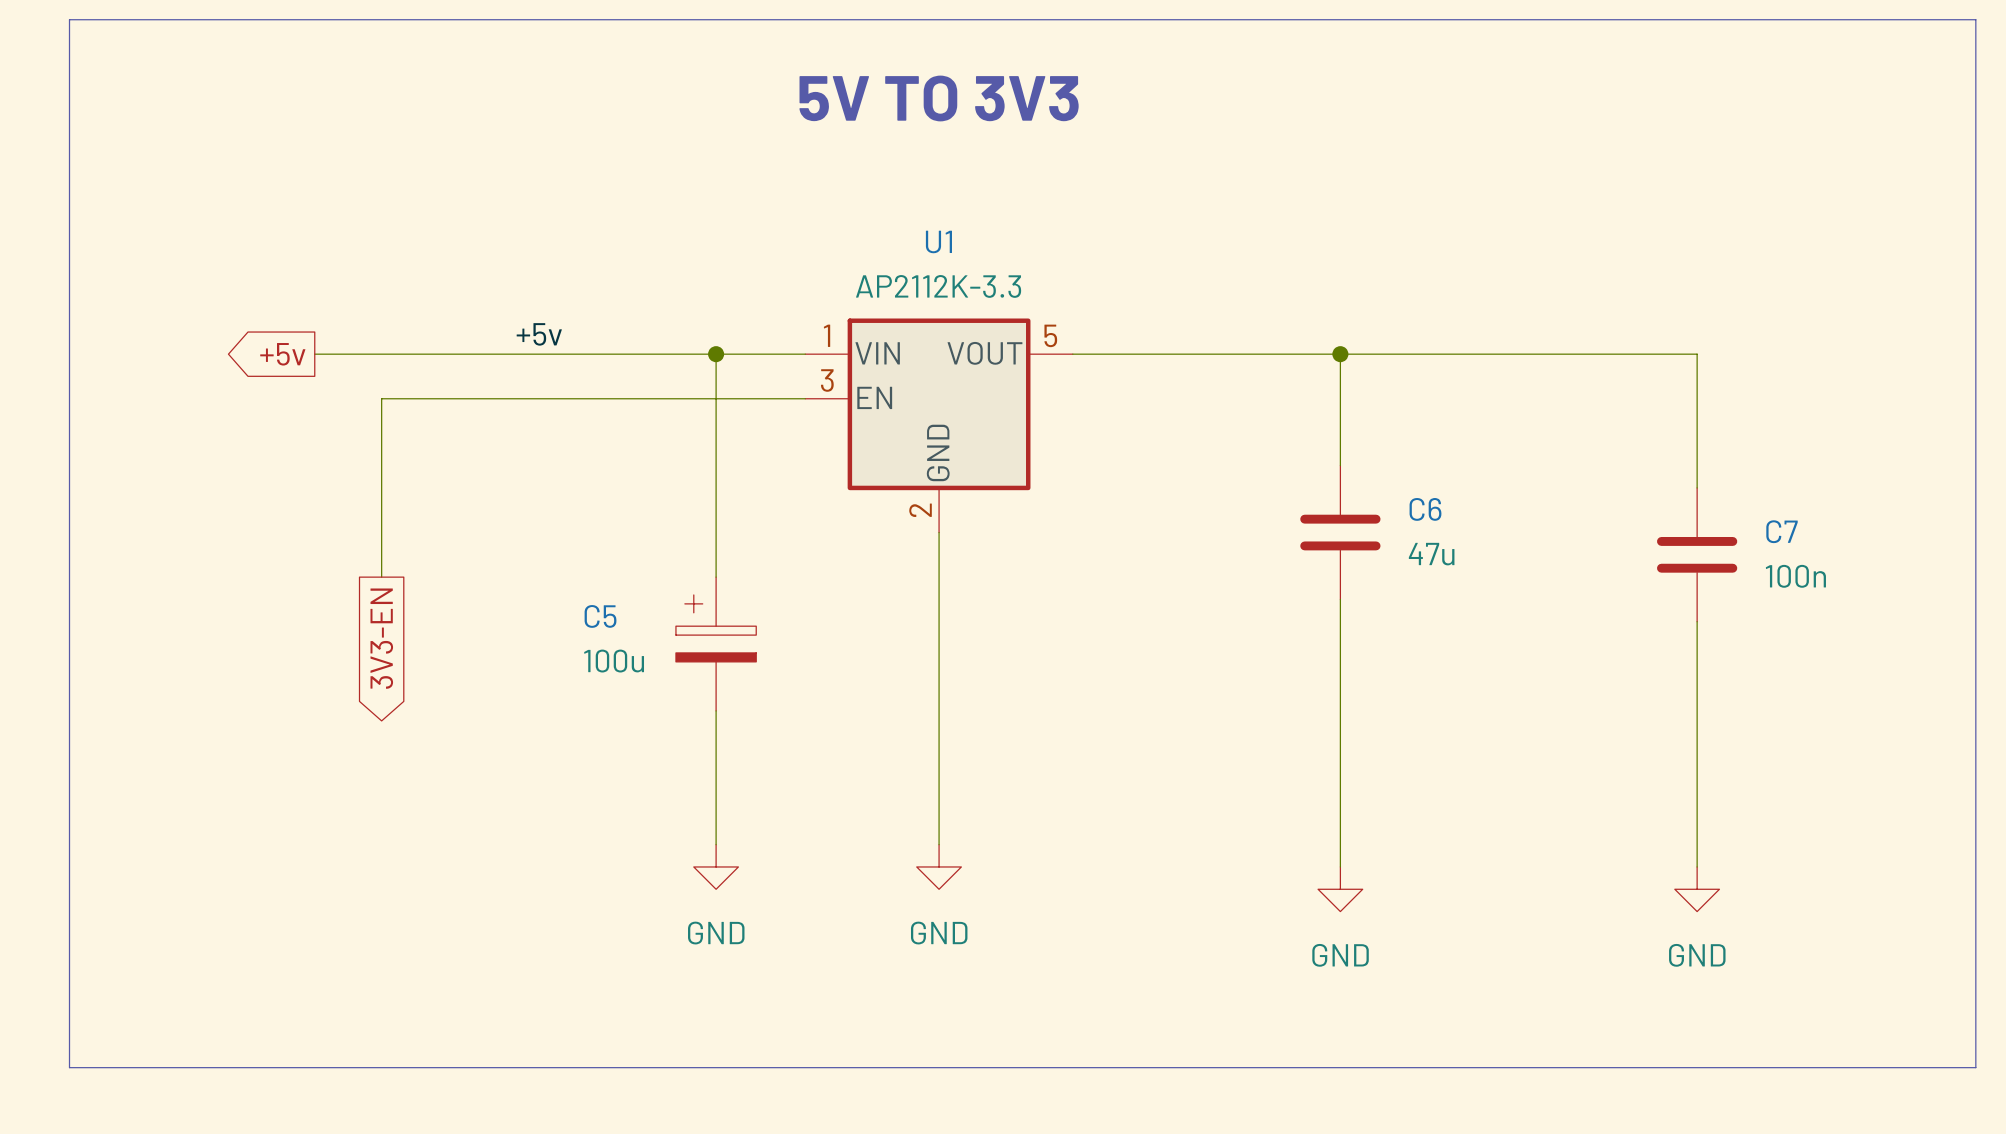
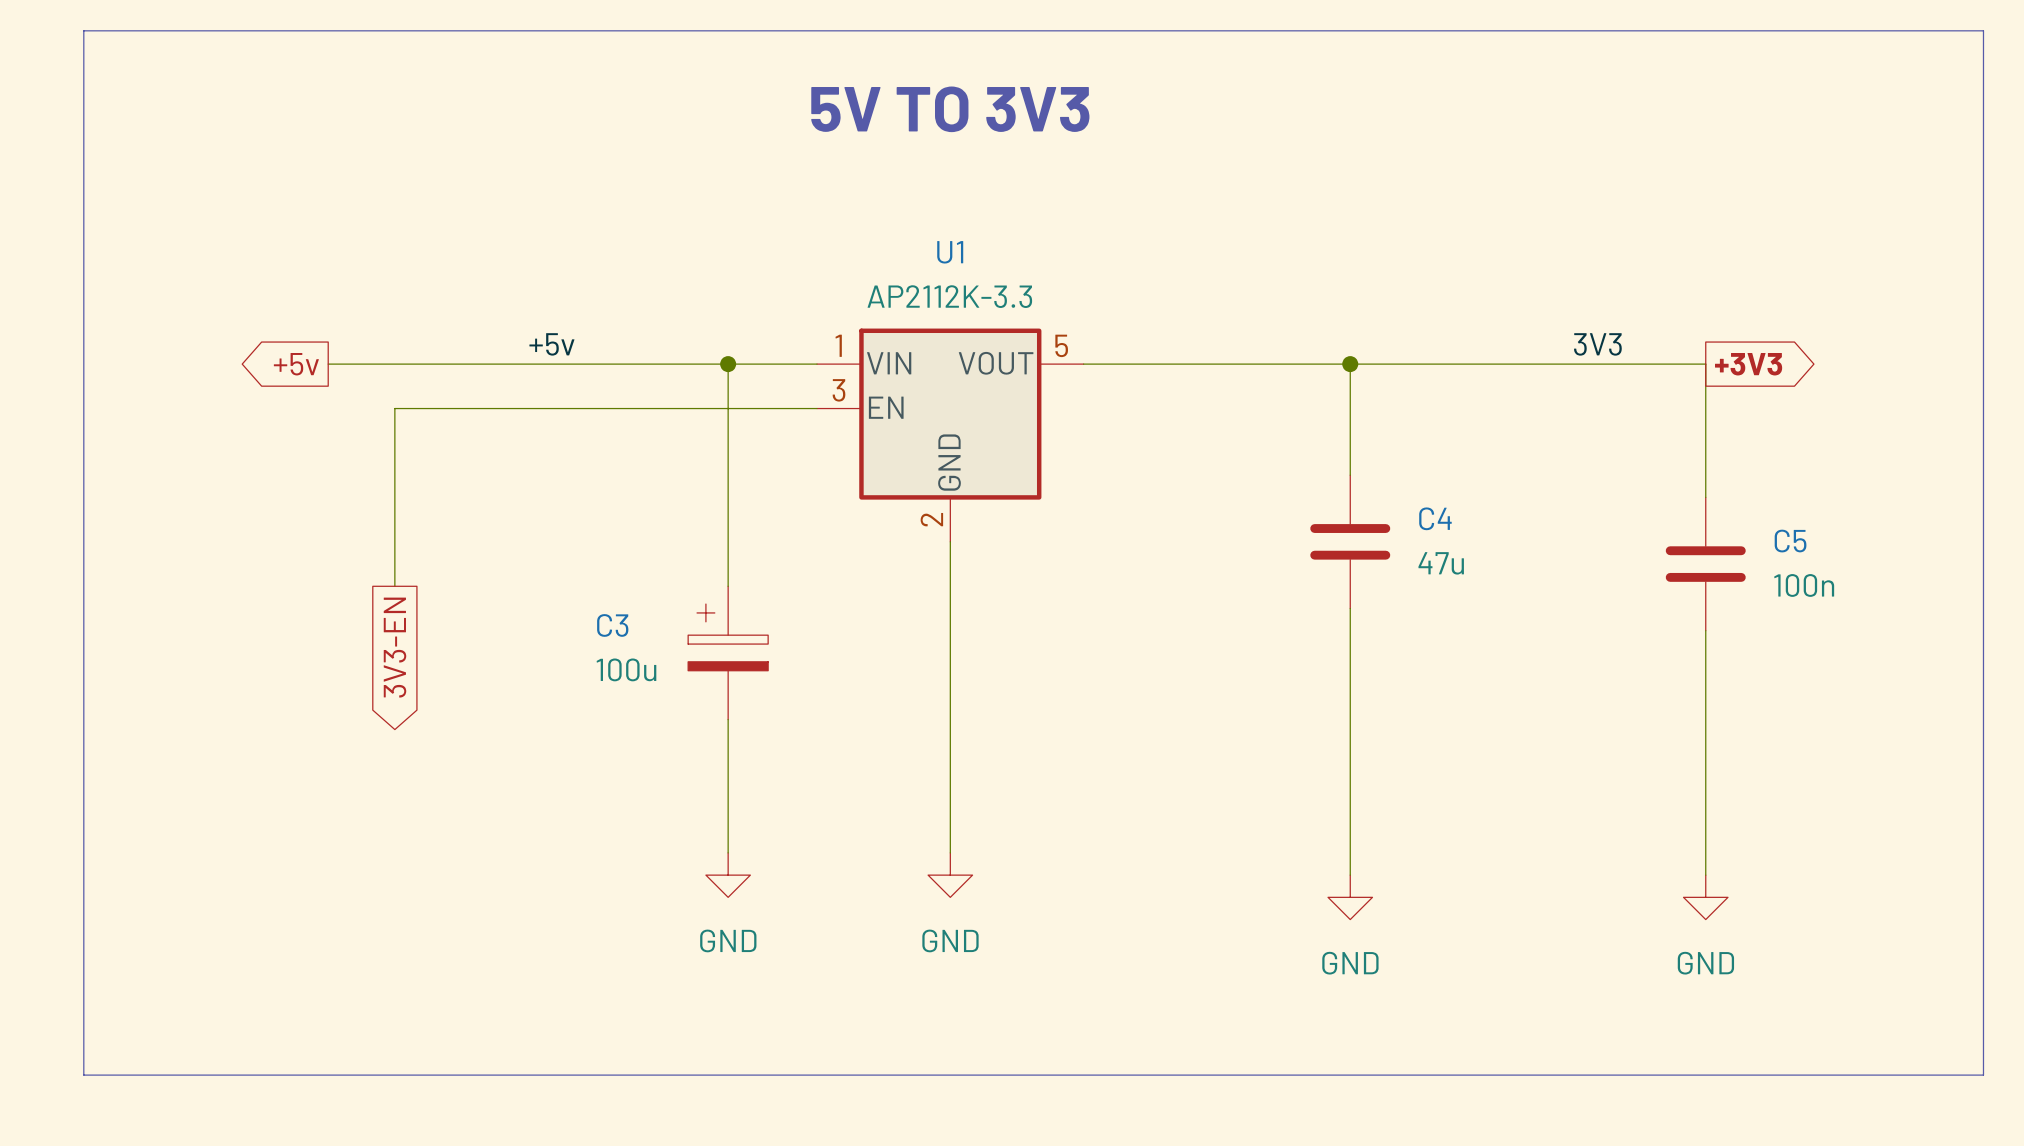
label: none -> 3V3 (1597, 344)
global label: none -> +3V3 (1748, 364)
C6 name: C6 (1425, 509) -> C4 (1435, 518)
C7 name: C7 (1782, 531) -> C5 (1790, 541)
C5 name: C5 (600, 616) -> C3 (612, 625)

